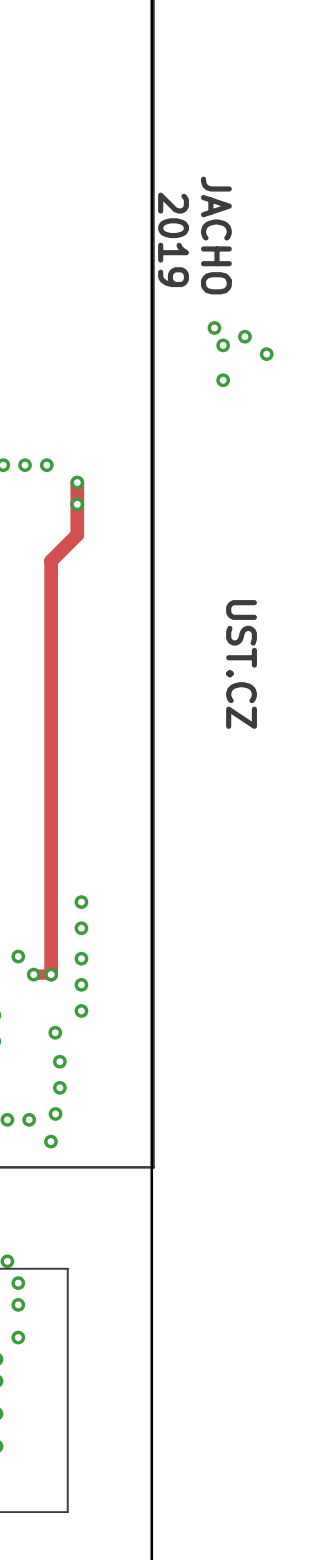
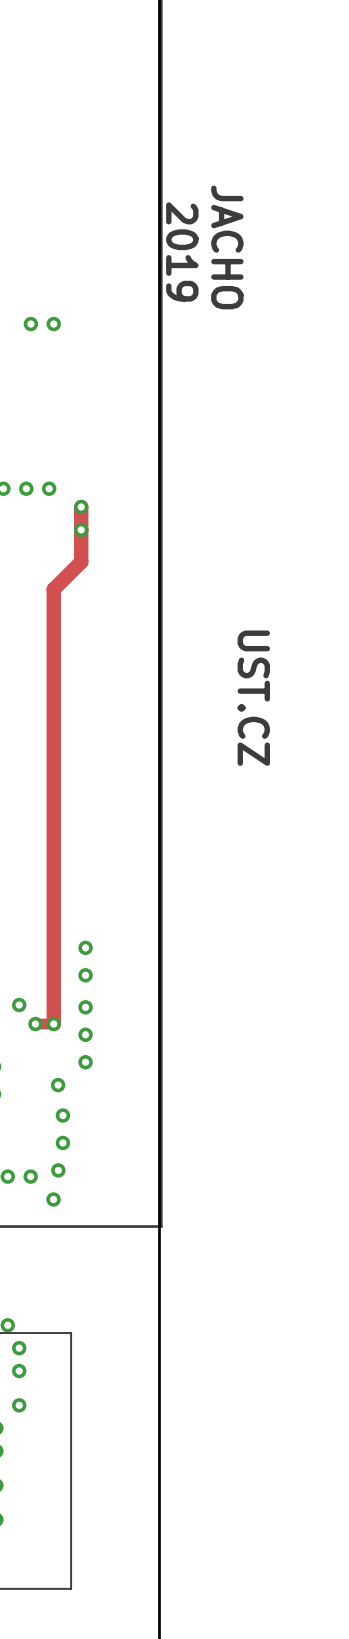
via: none -> (30, 324)
via: none -> (53, 324)
via: (214, 328) -> none
via: (244, 336) -> none
via: (223, 345) -> none
via: (266, 354) -> none
via: (223, 380) -> none

